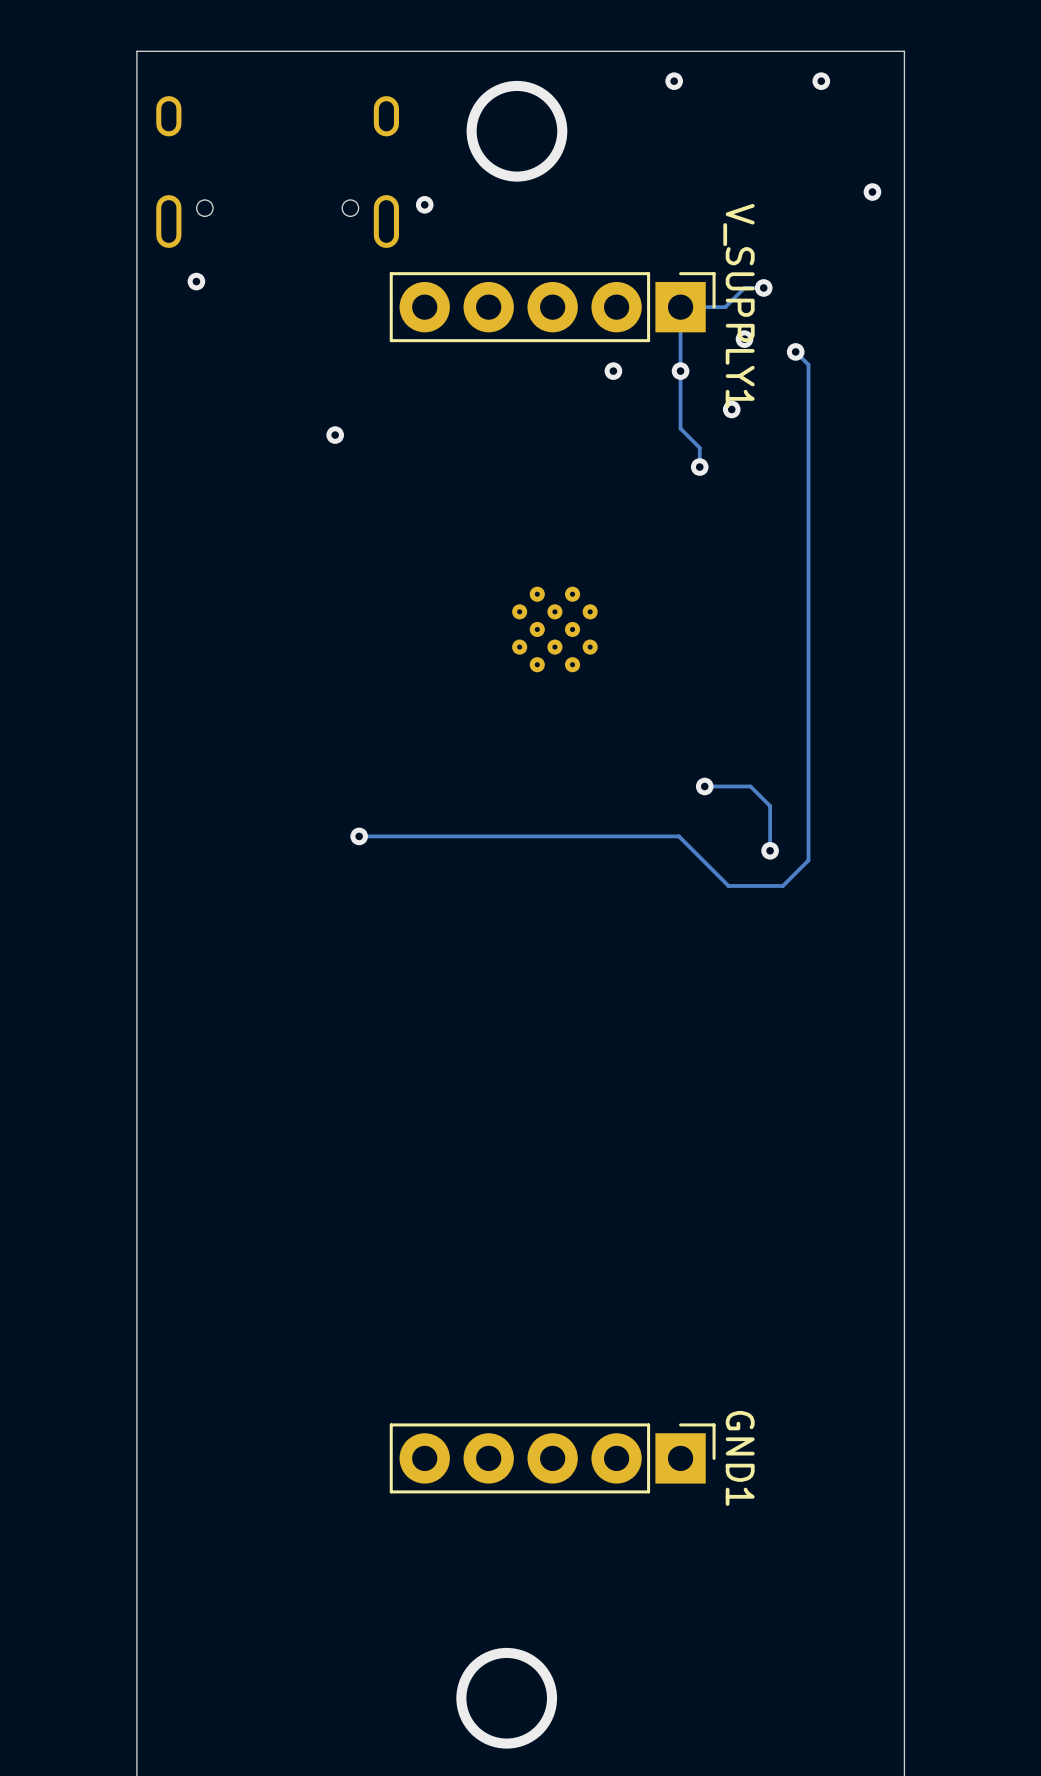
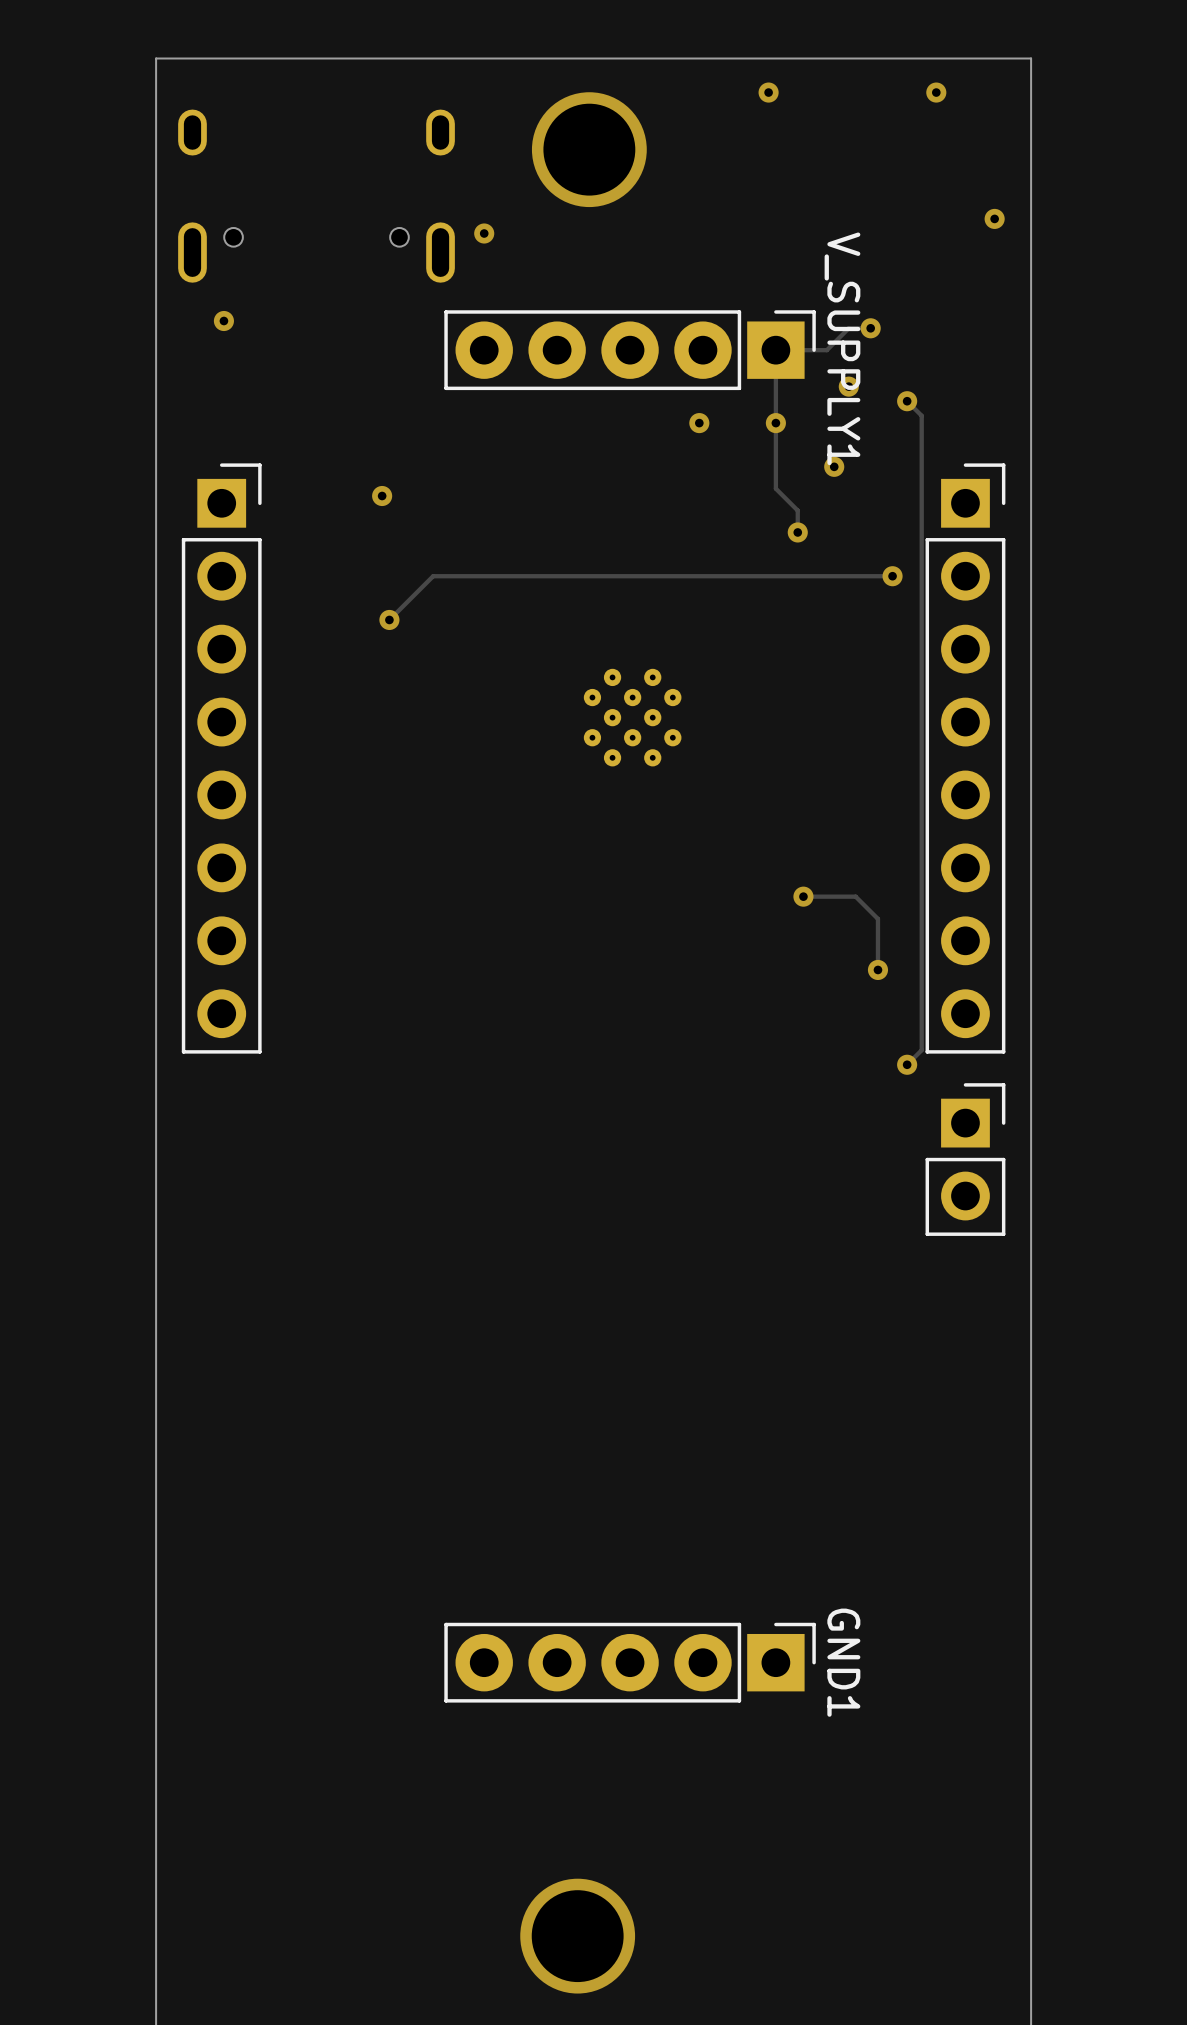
track: none -> (892, 576) (433, 576) (389, 619)
via: none -> (892, 576)
via: none -> (389, 619)
part: none -> (221, 758)
part: none -> (965, 758)
track: (359, 836) (678, 836) (728, 885) (782, 885) (808, 860) -> (907, 1064) (921, 1050) (921, 980)
via: (359, 836) -> none
via: none -> (907, 1064)
part: none -> (965, 1159)

